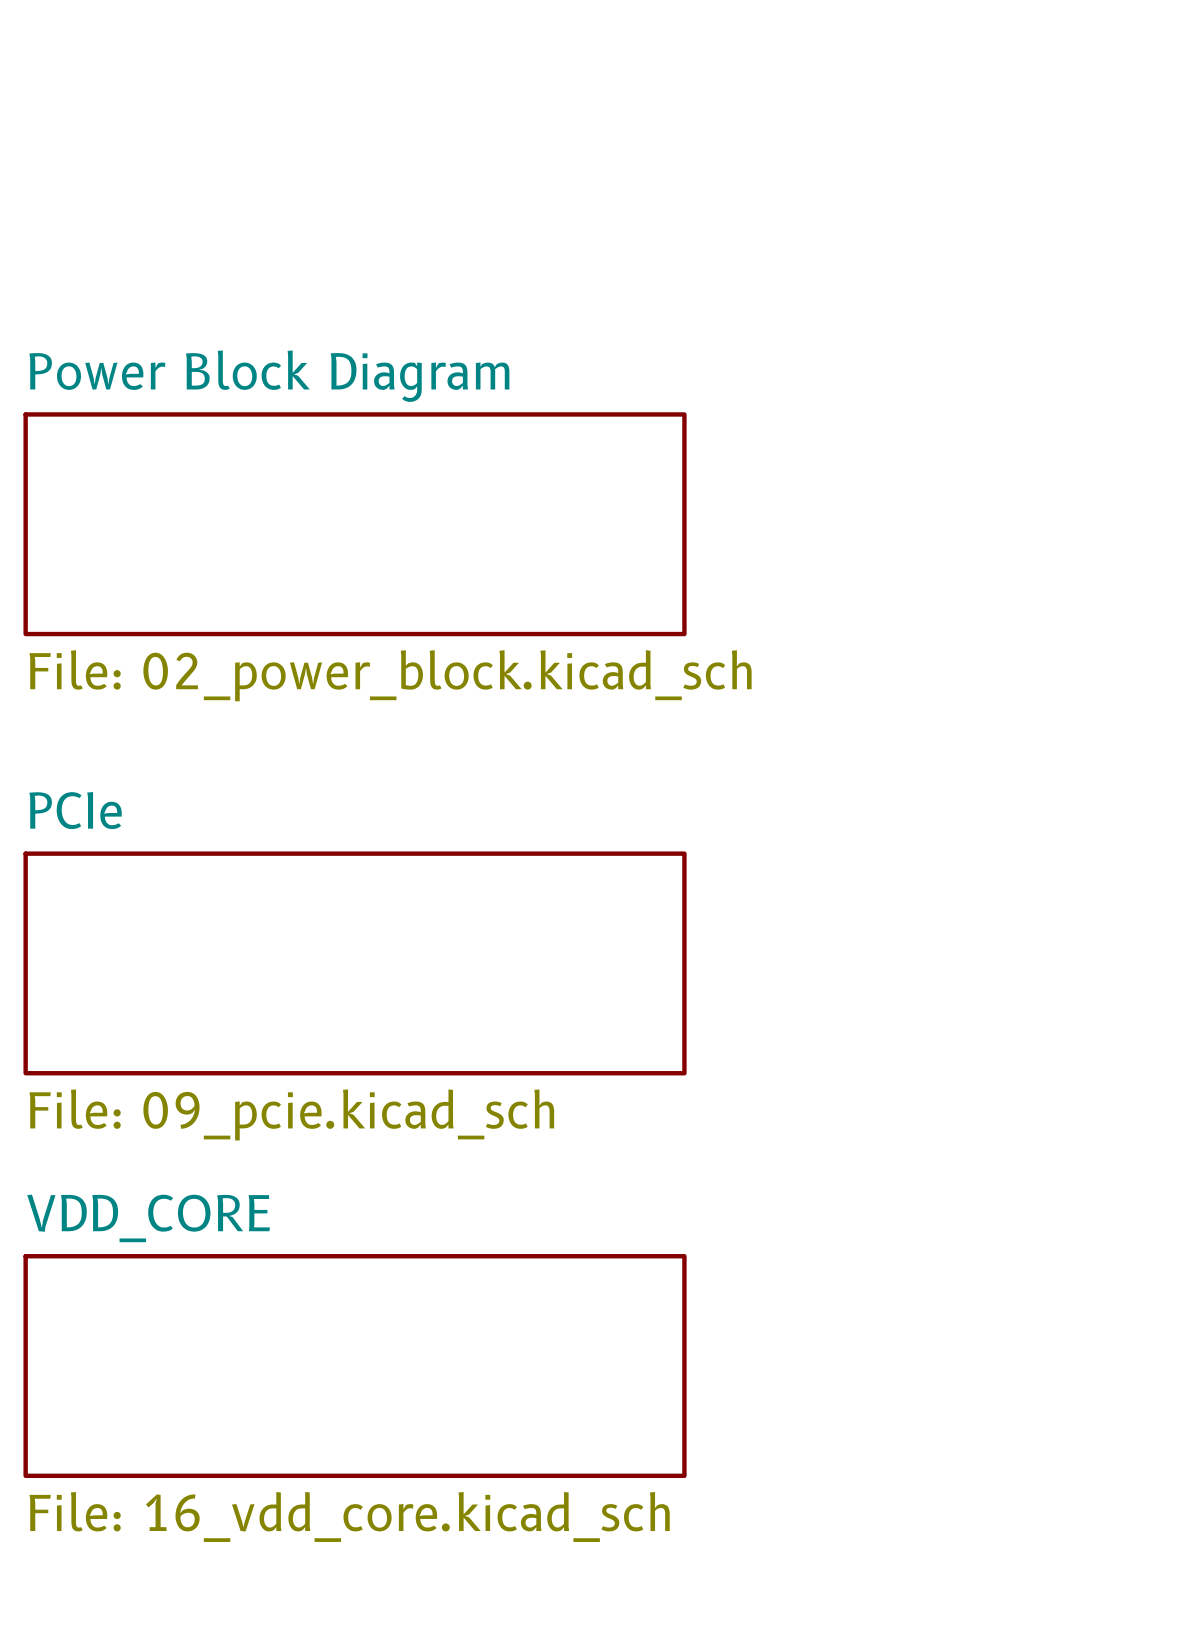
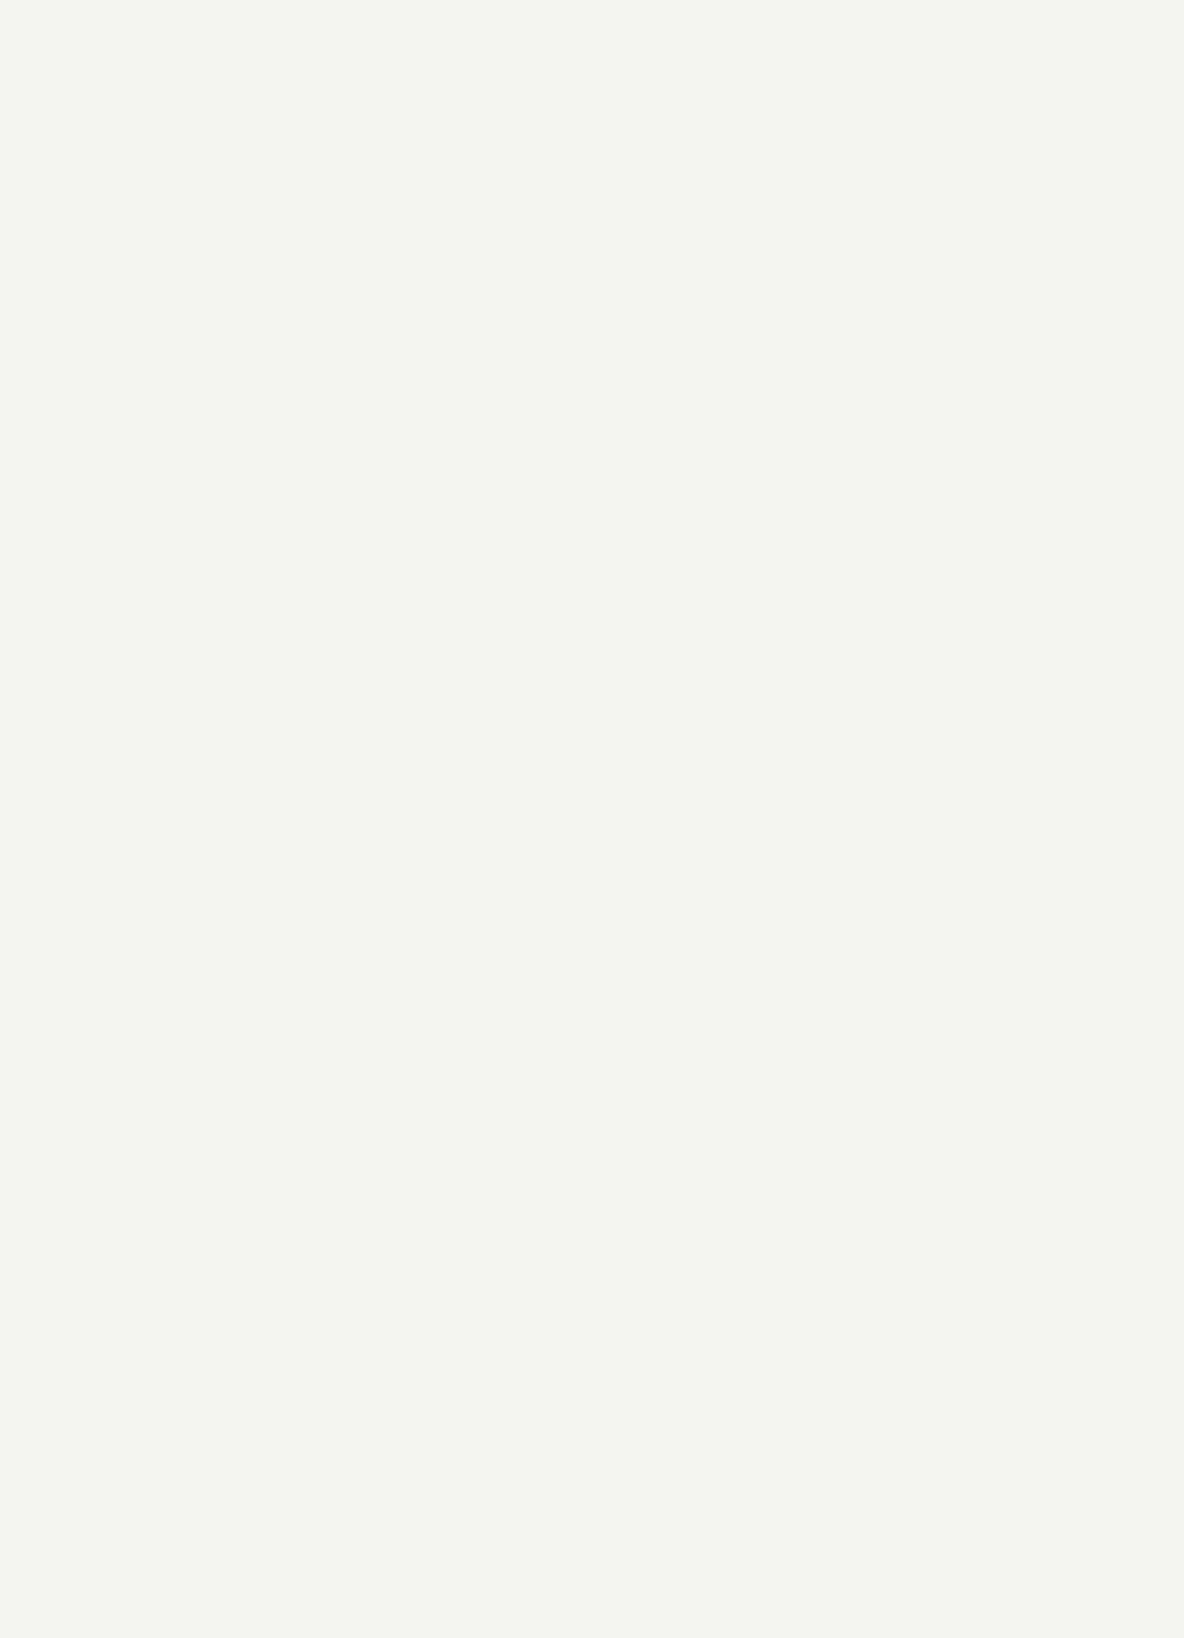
sheet Power Block Diagram: File: 02_power_block.kicad_sch (355, 524) -> none
sheet PCIe: File: 09_pcie.kicad_sch (355, 963) -> none
sheet VDD_CORE: File: 16_vdd_core.kicad_sch (355, 1366) -> none

